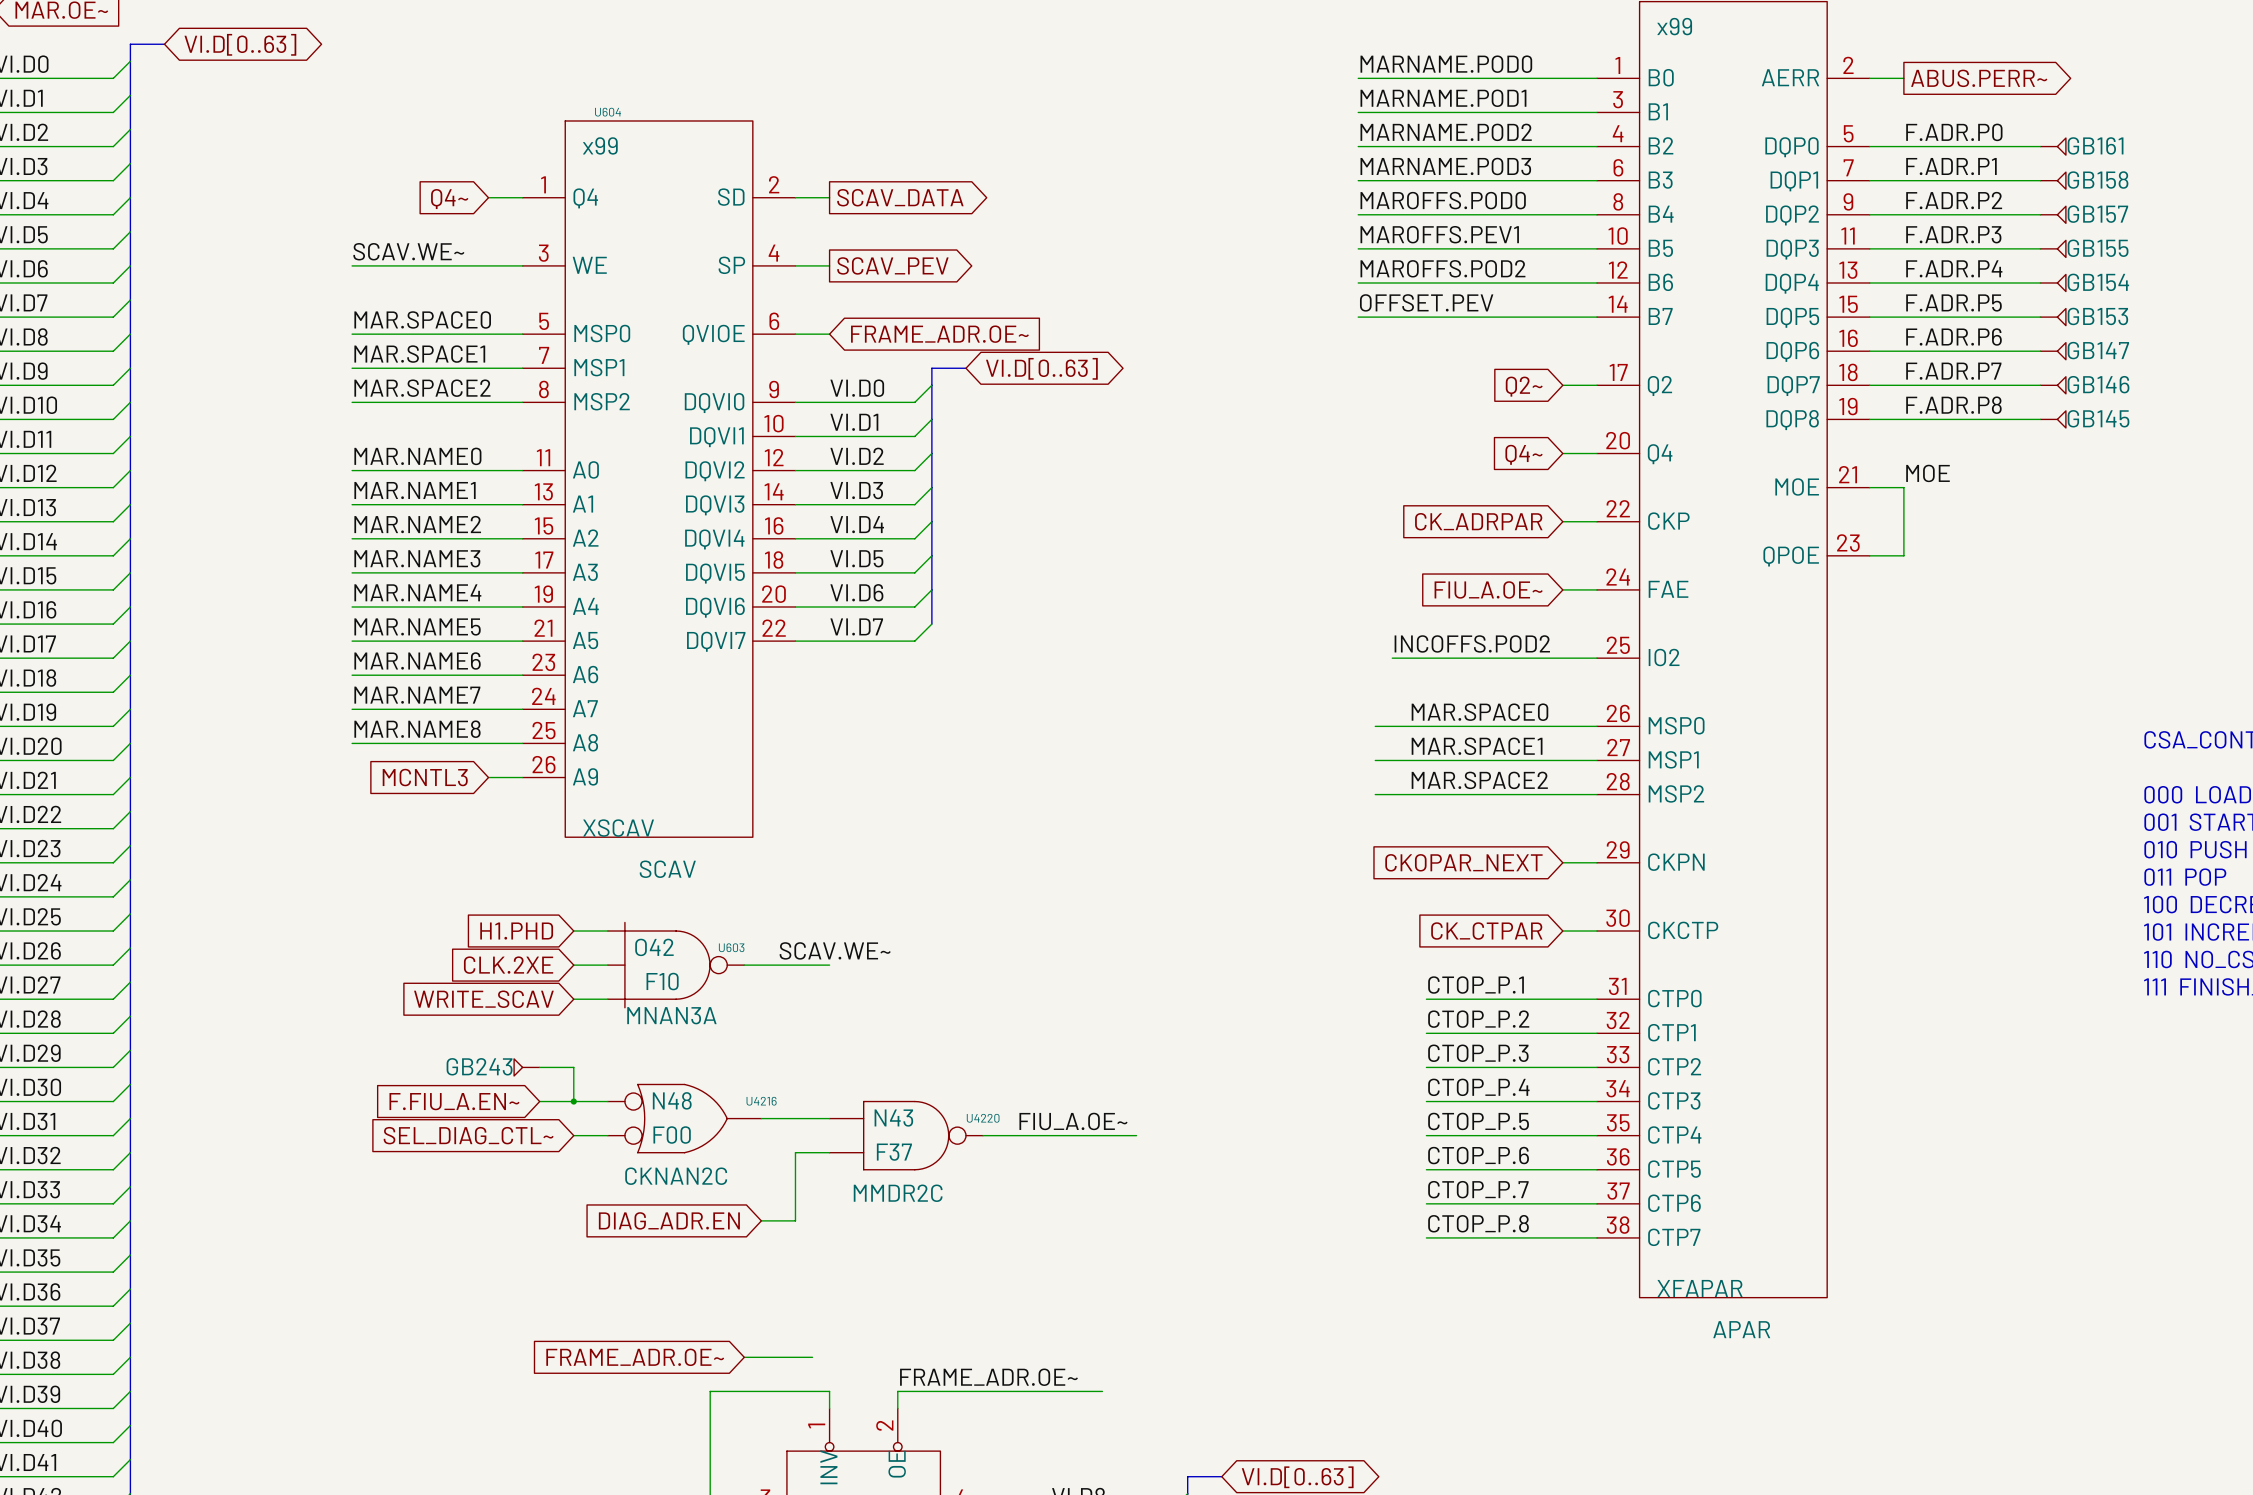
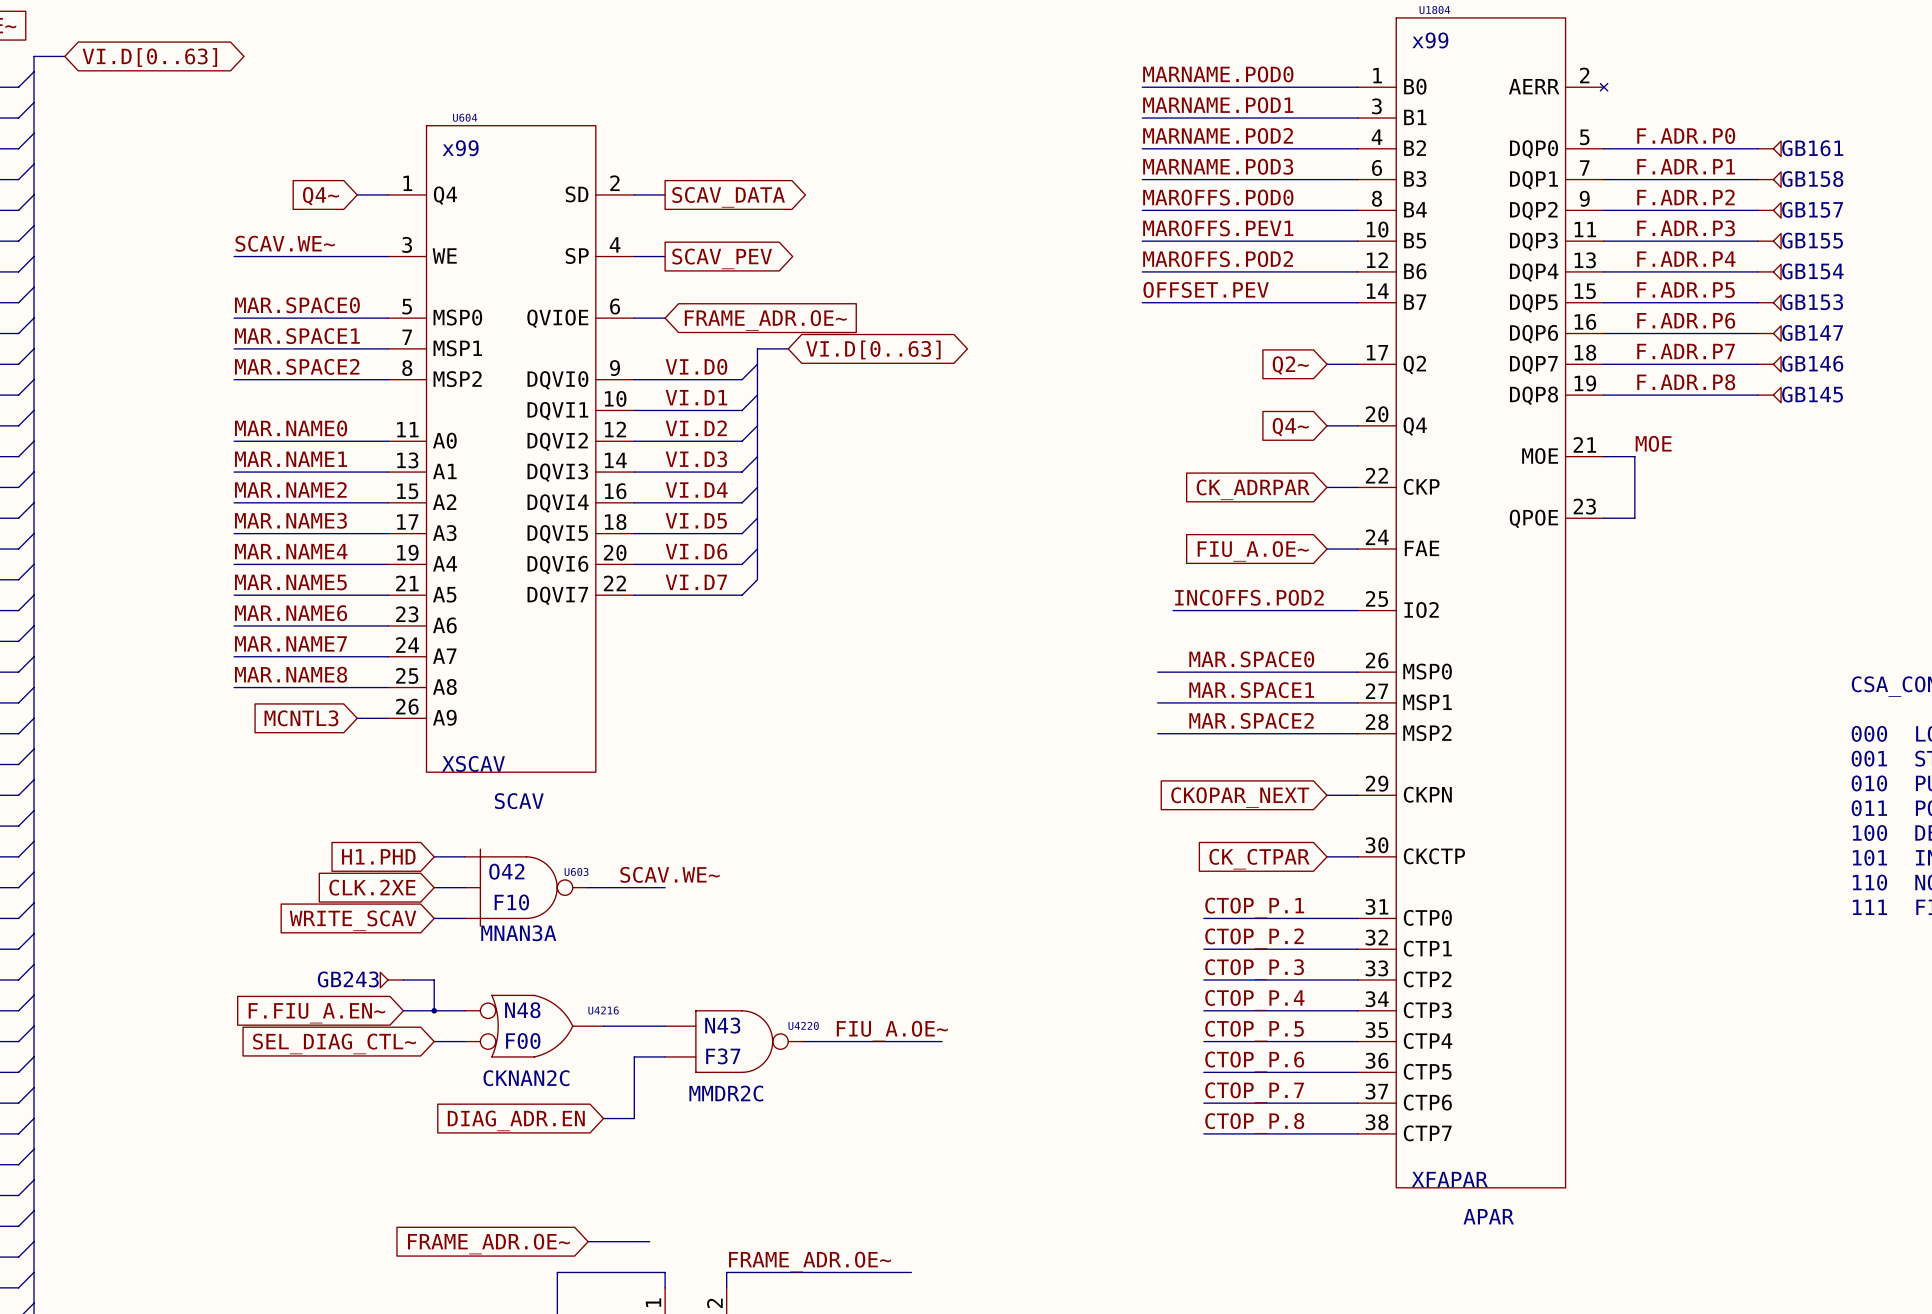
wire: (1869, 78) (1903, 78) -> none
no-connect mark: none -> (1604, 87)
global label: ABUS.PERR~ (1979, 78) -> none

